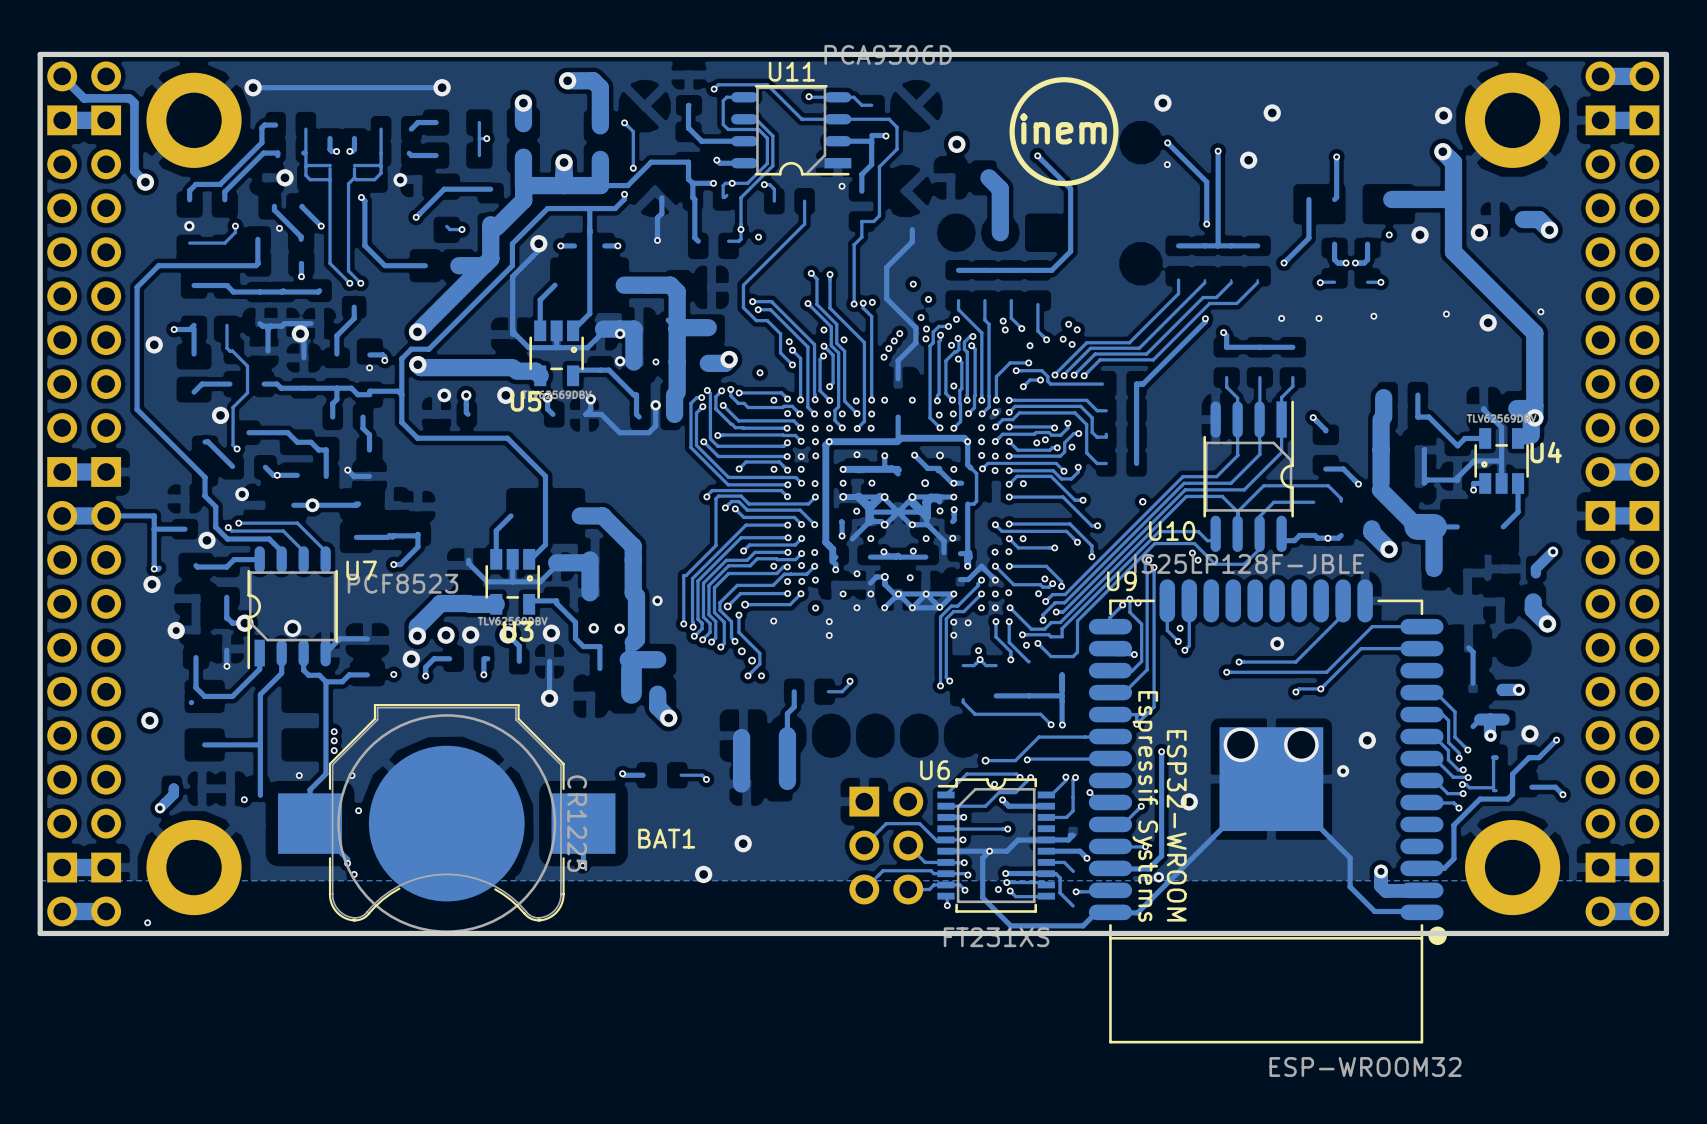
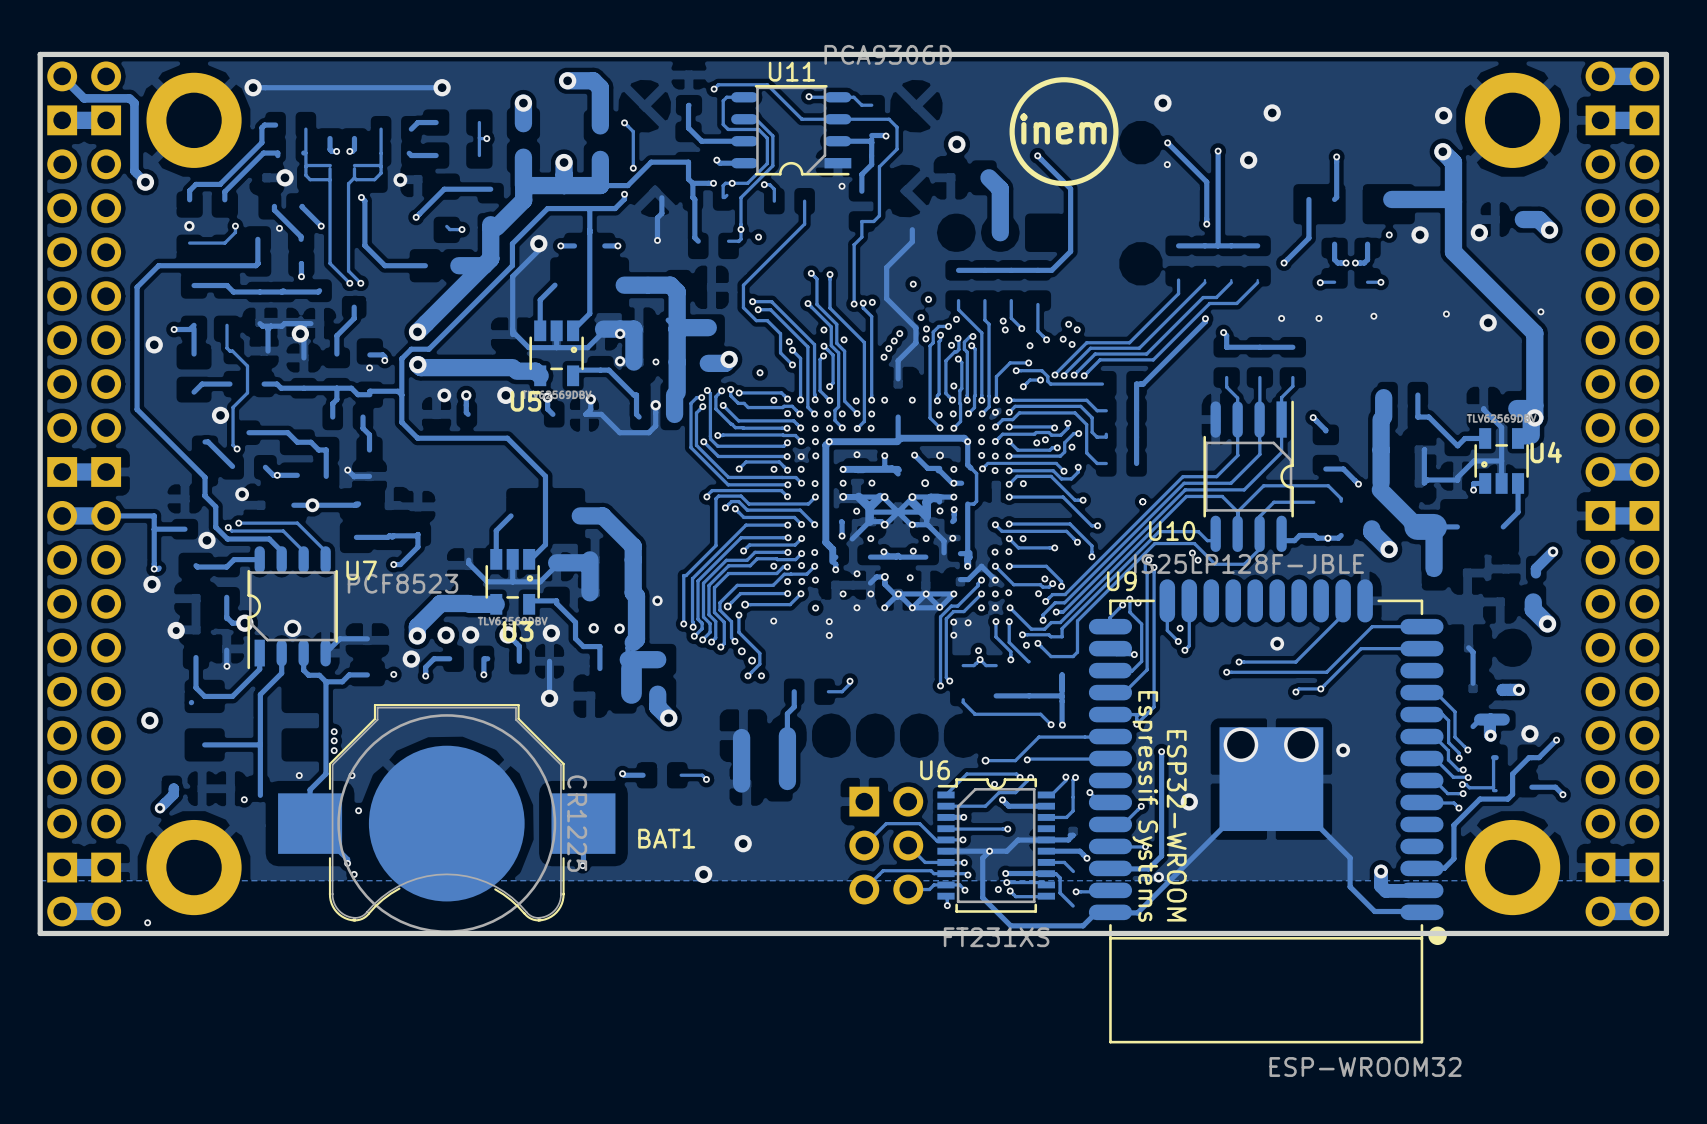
via: (1367, 740) -> none
via: none -> (1343, 750)
via: (1343, 771) -> none

